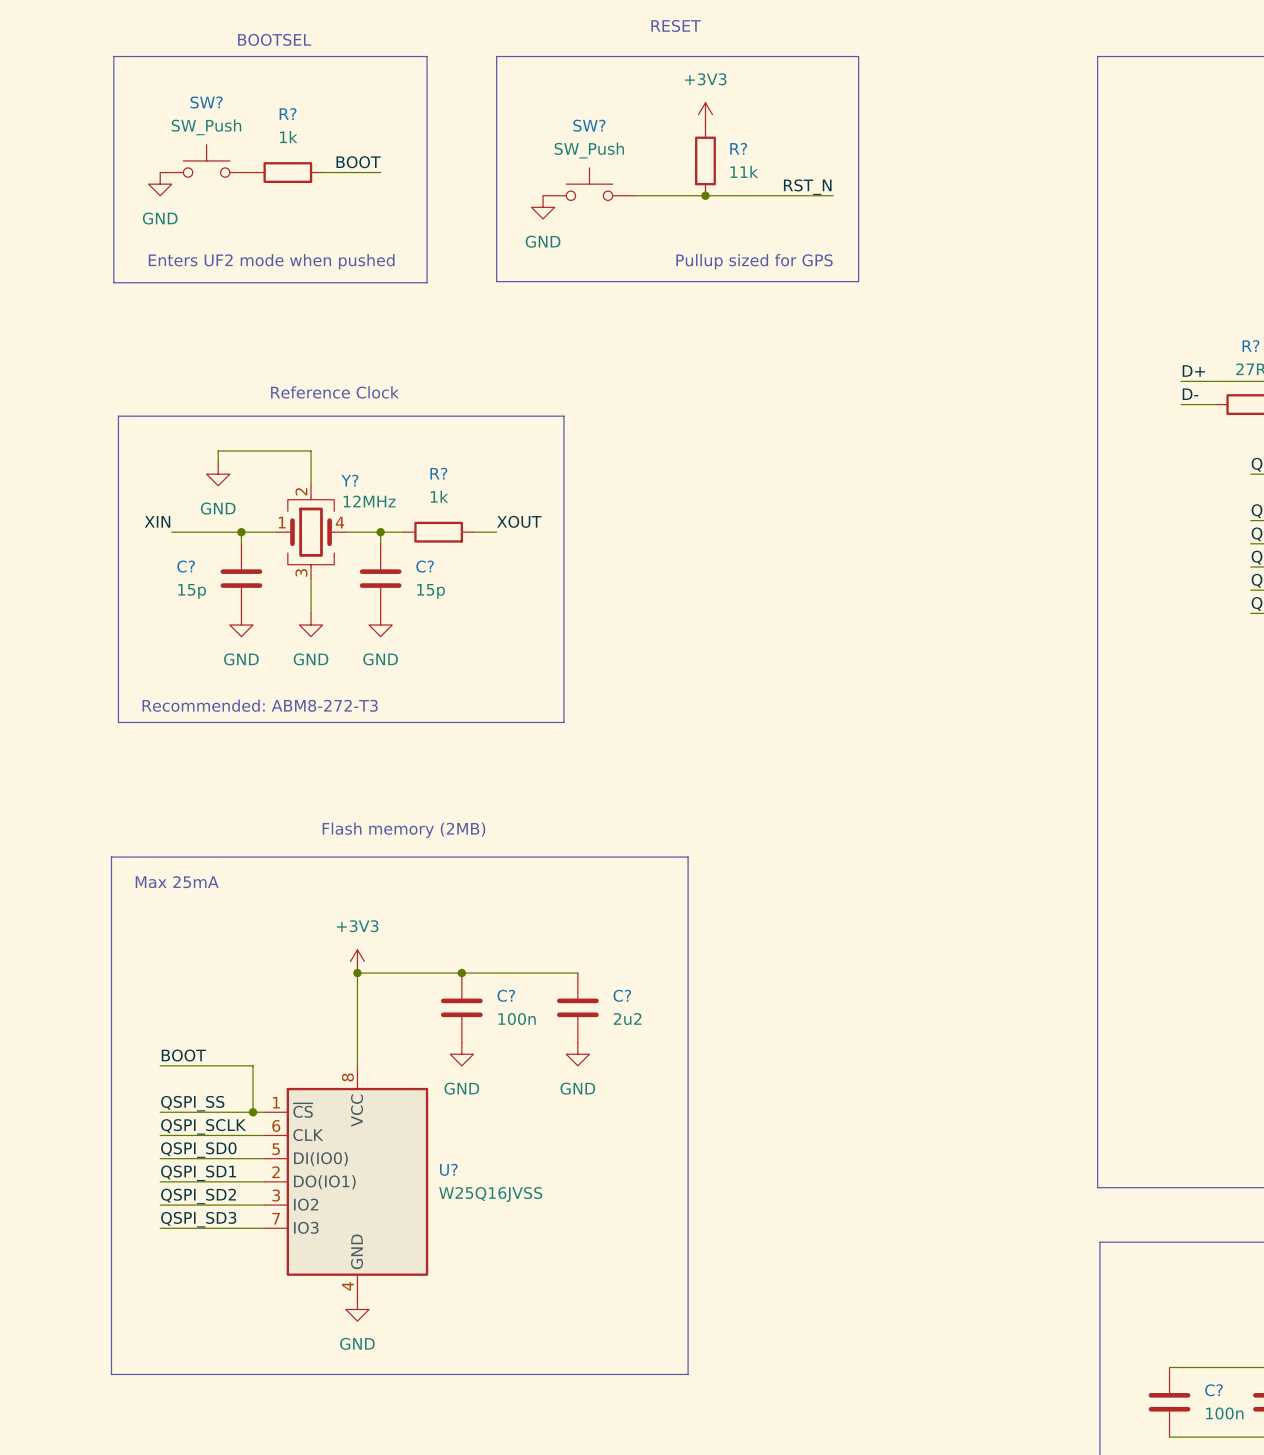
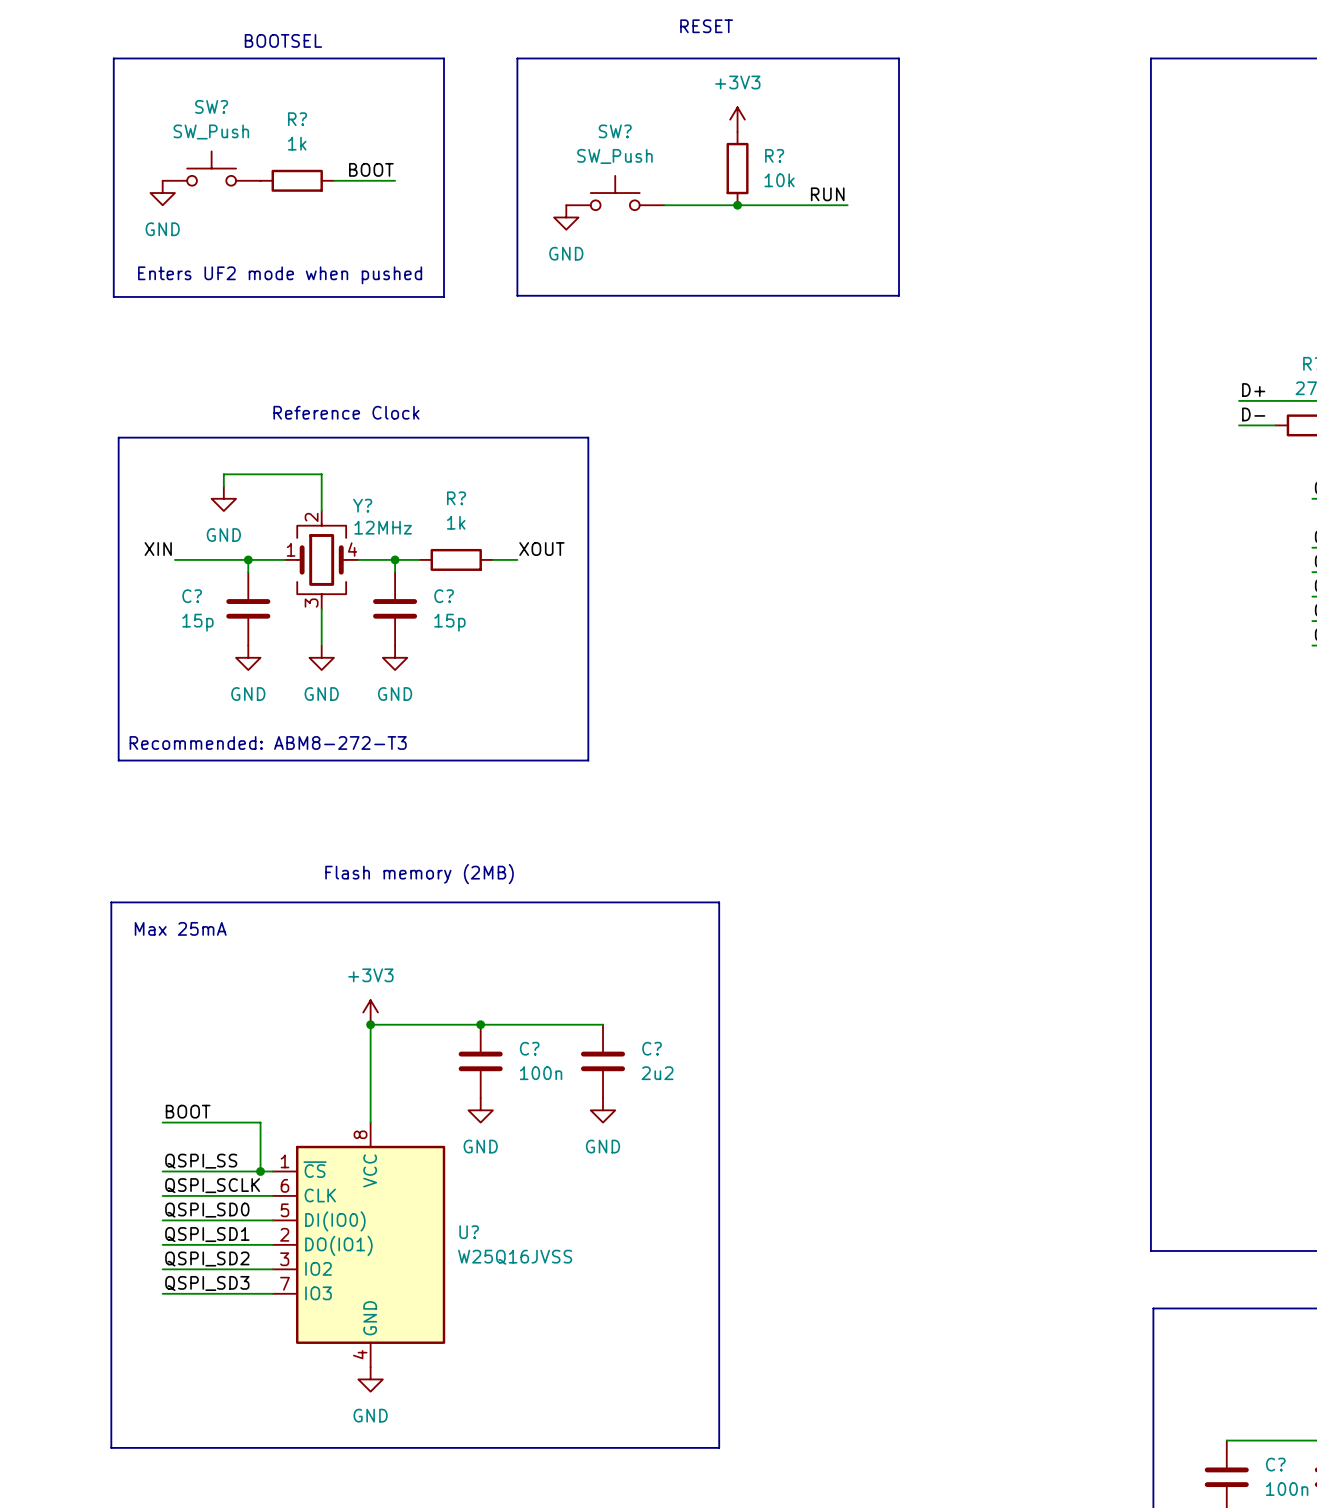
R? value: 11k (744, 171) -> 10k (779, 180)
label: none -> RUN (827, 194)
label: RST_N (807, 187) -> none
wire: (809, 195) (833, 195) -> none
text: Pullup sized for GPS (754, 261) -> none

